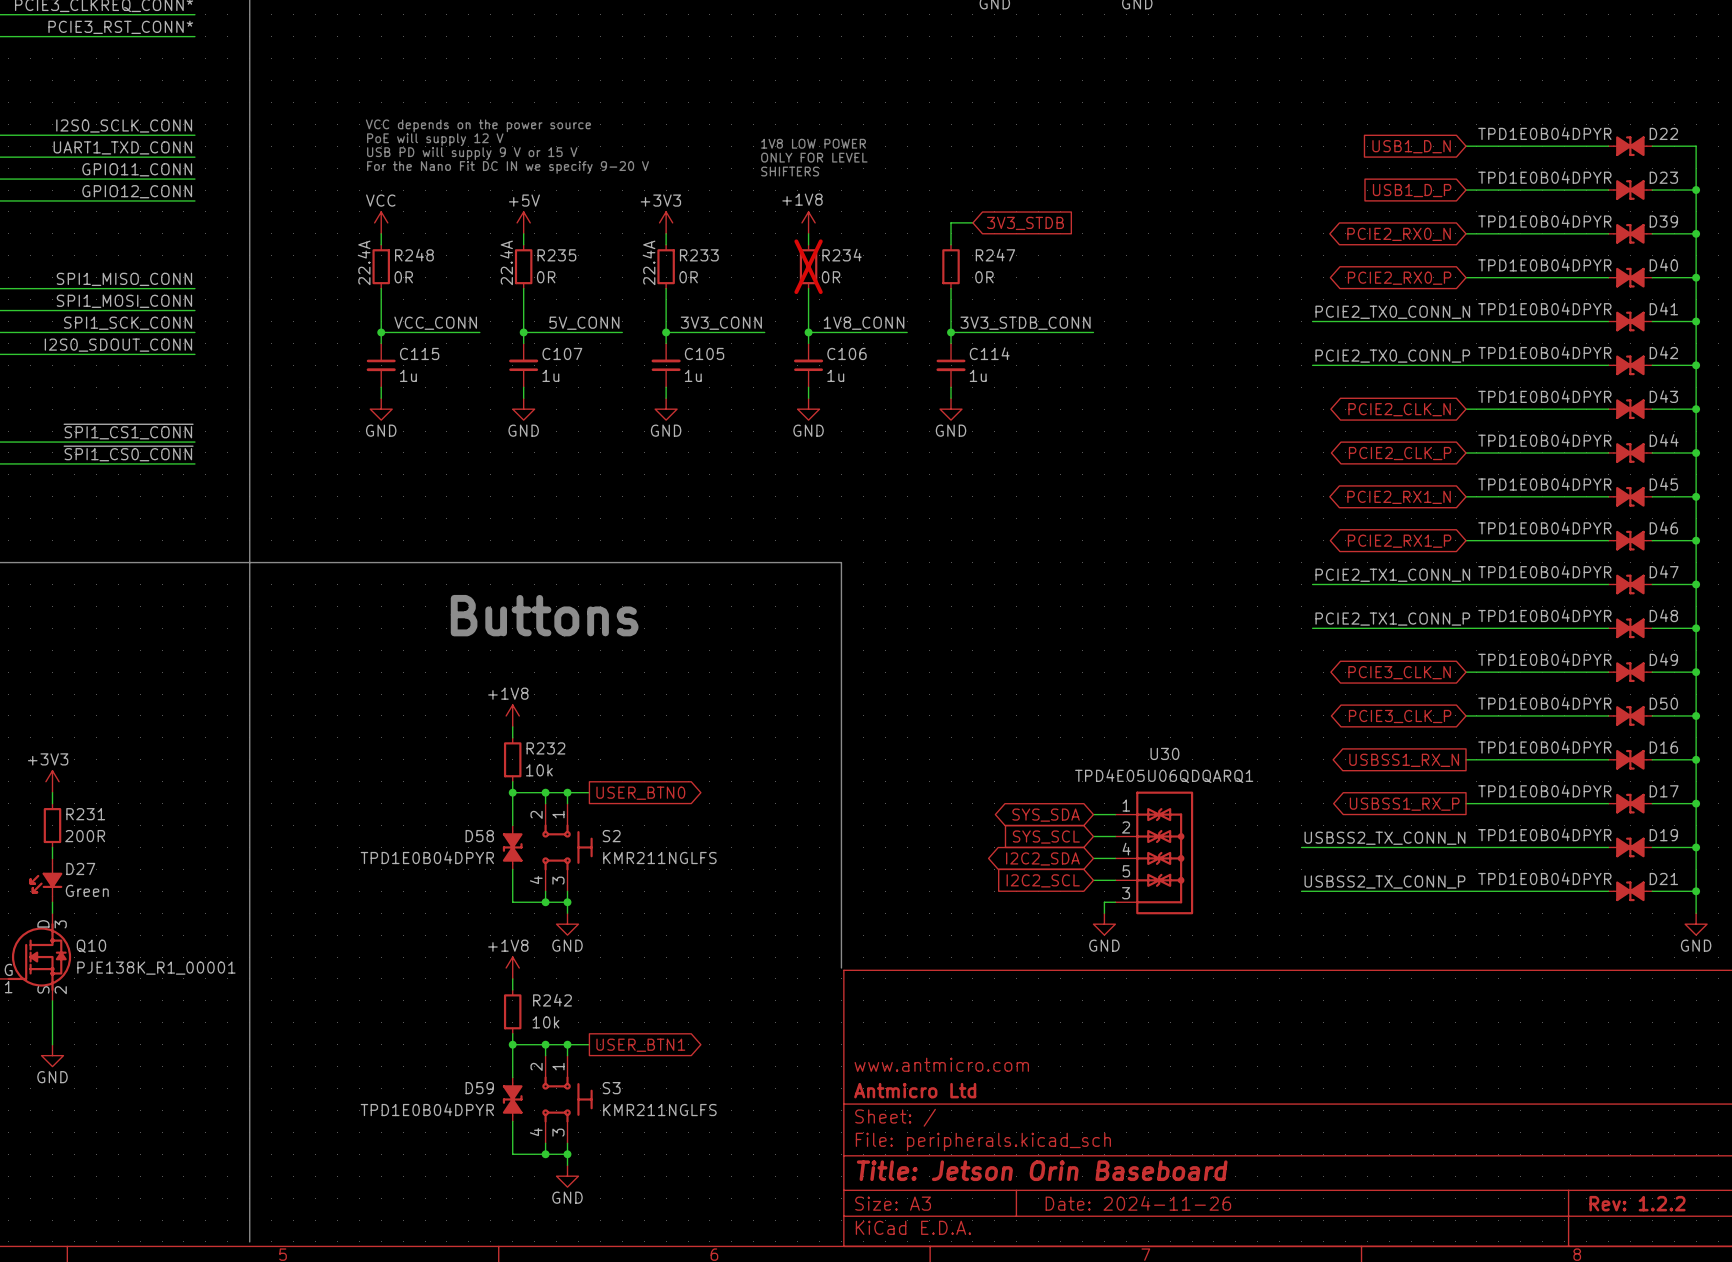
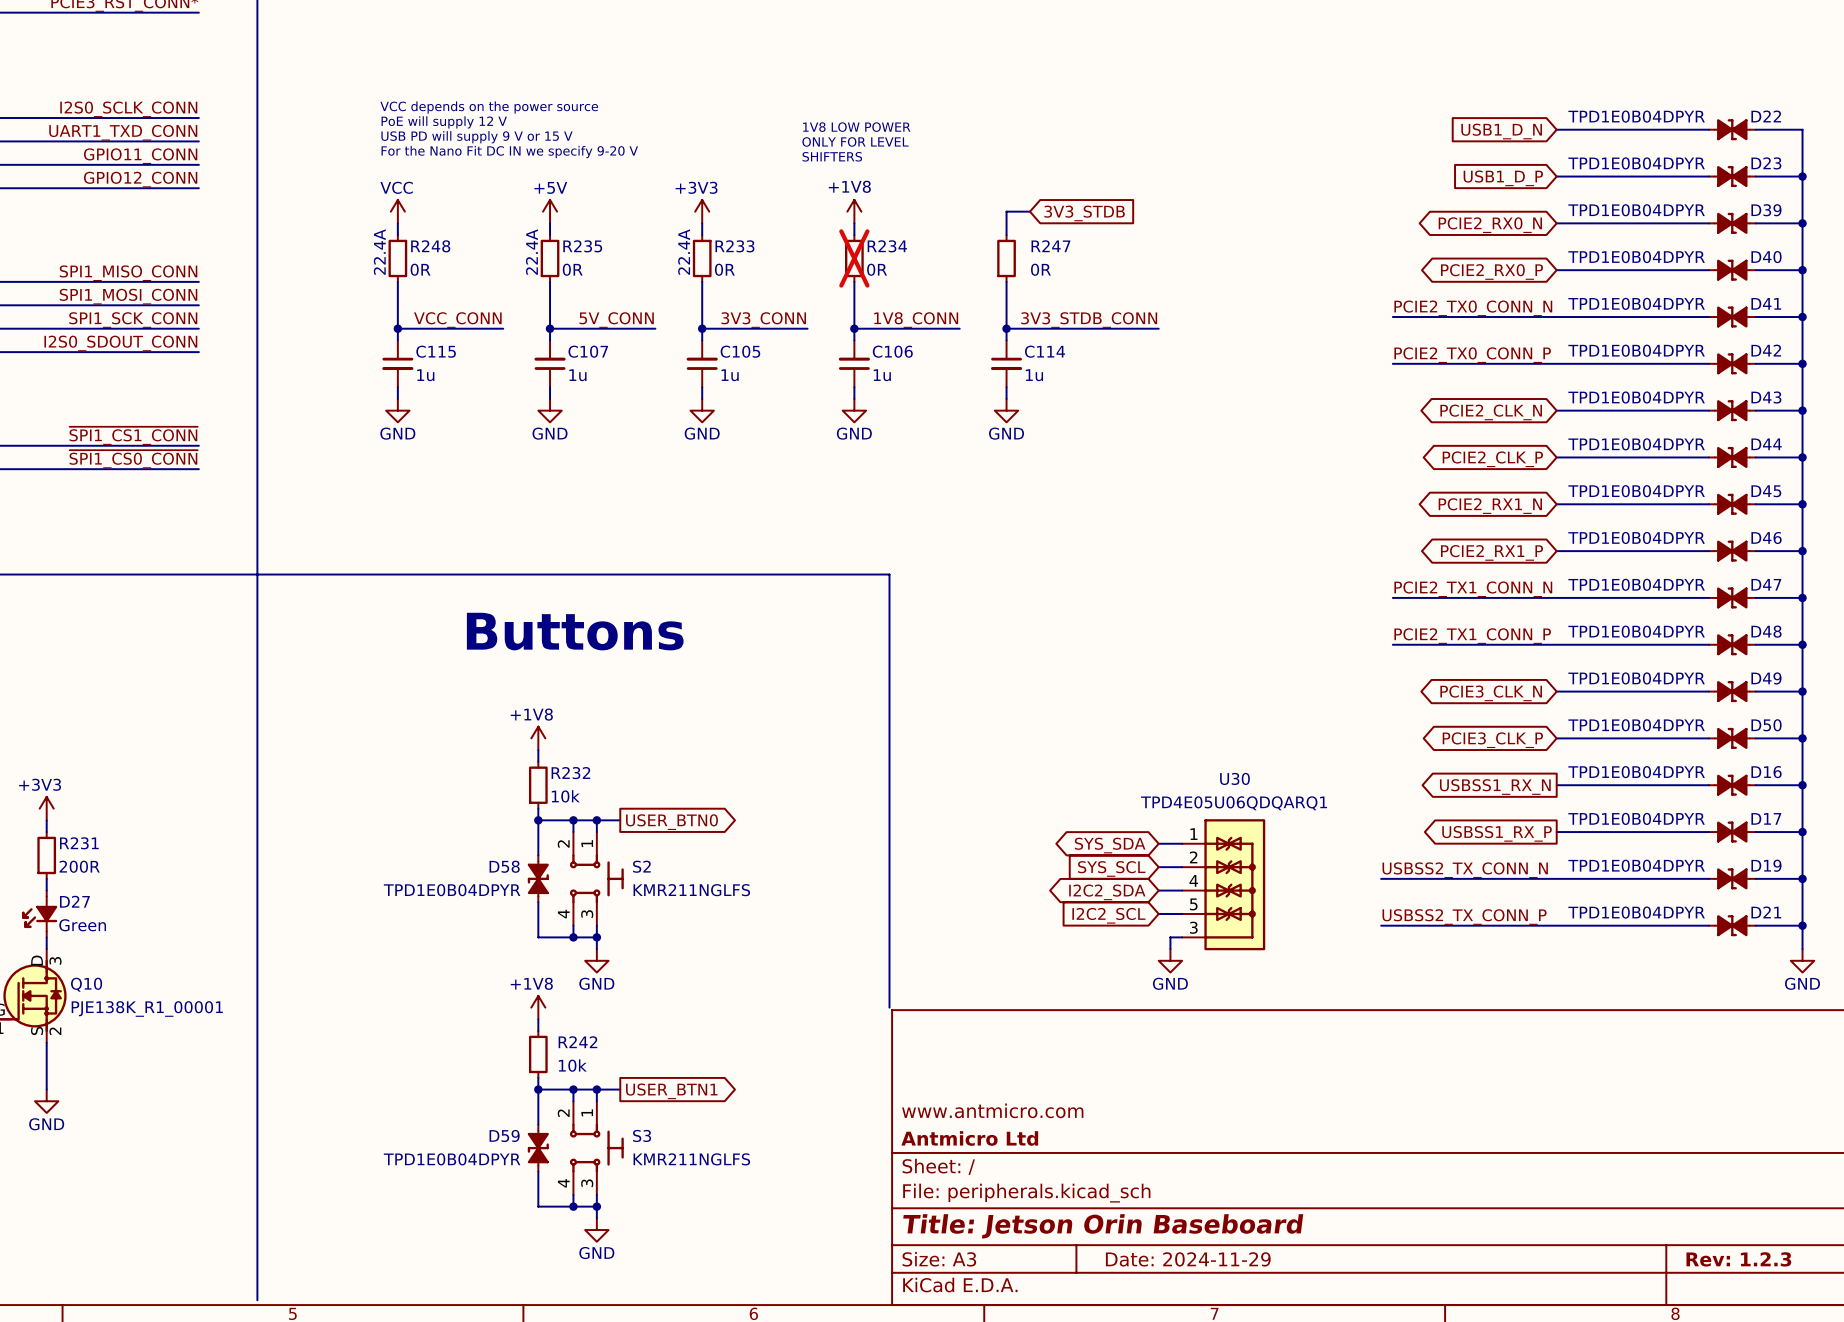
title block: Date: 2024-11-26 (1138, 1203) -> Date: 2024-11-29 (1188, 1259)
title block: Rev: 1.2.2 (1637, 1203) -> Rev: 1.2.3 (1738, 1259)

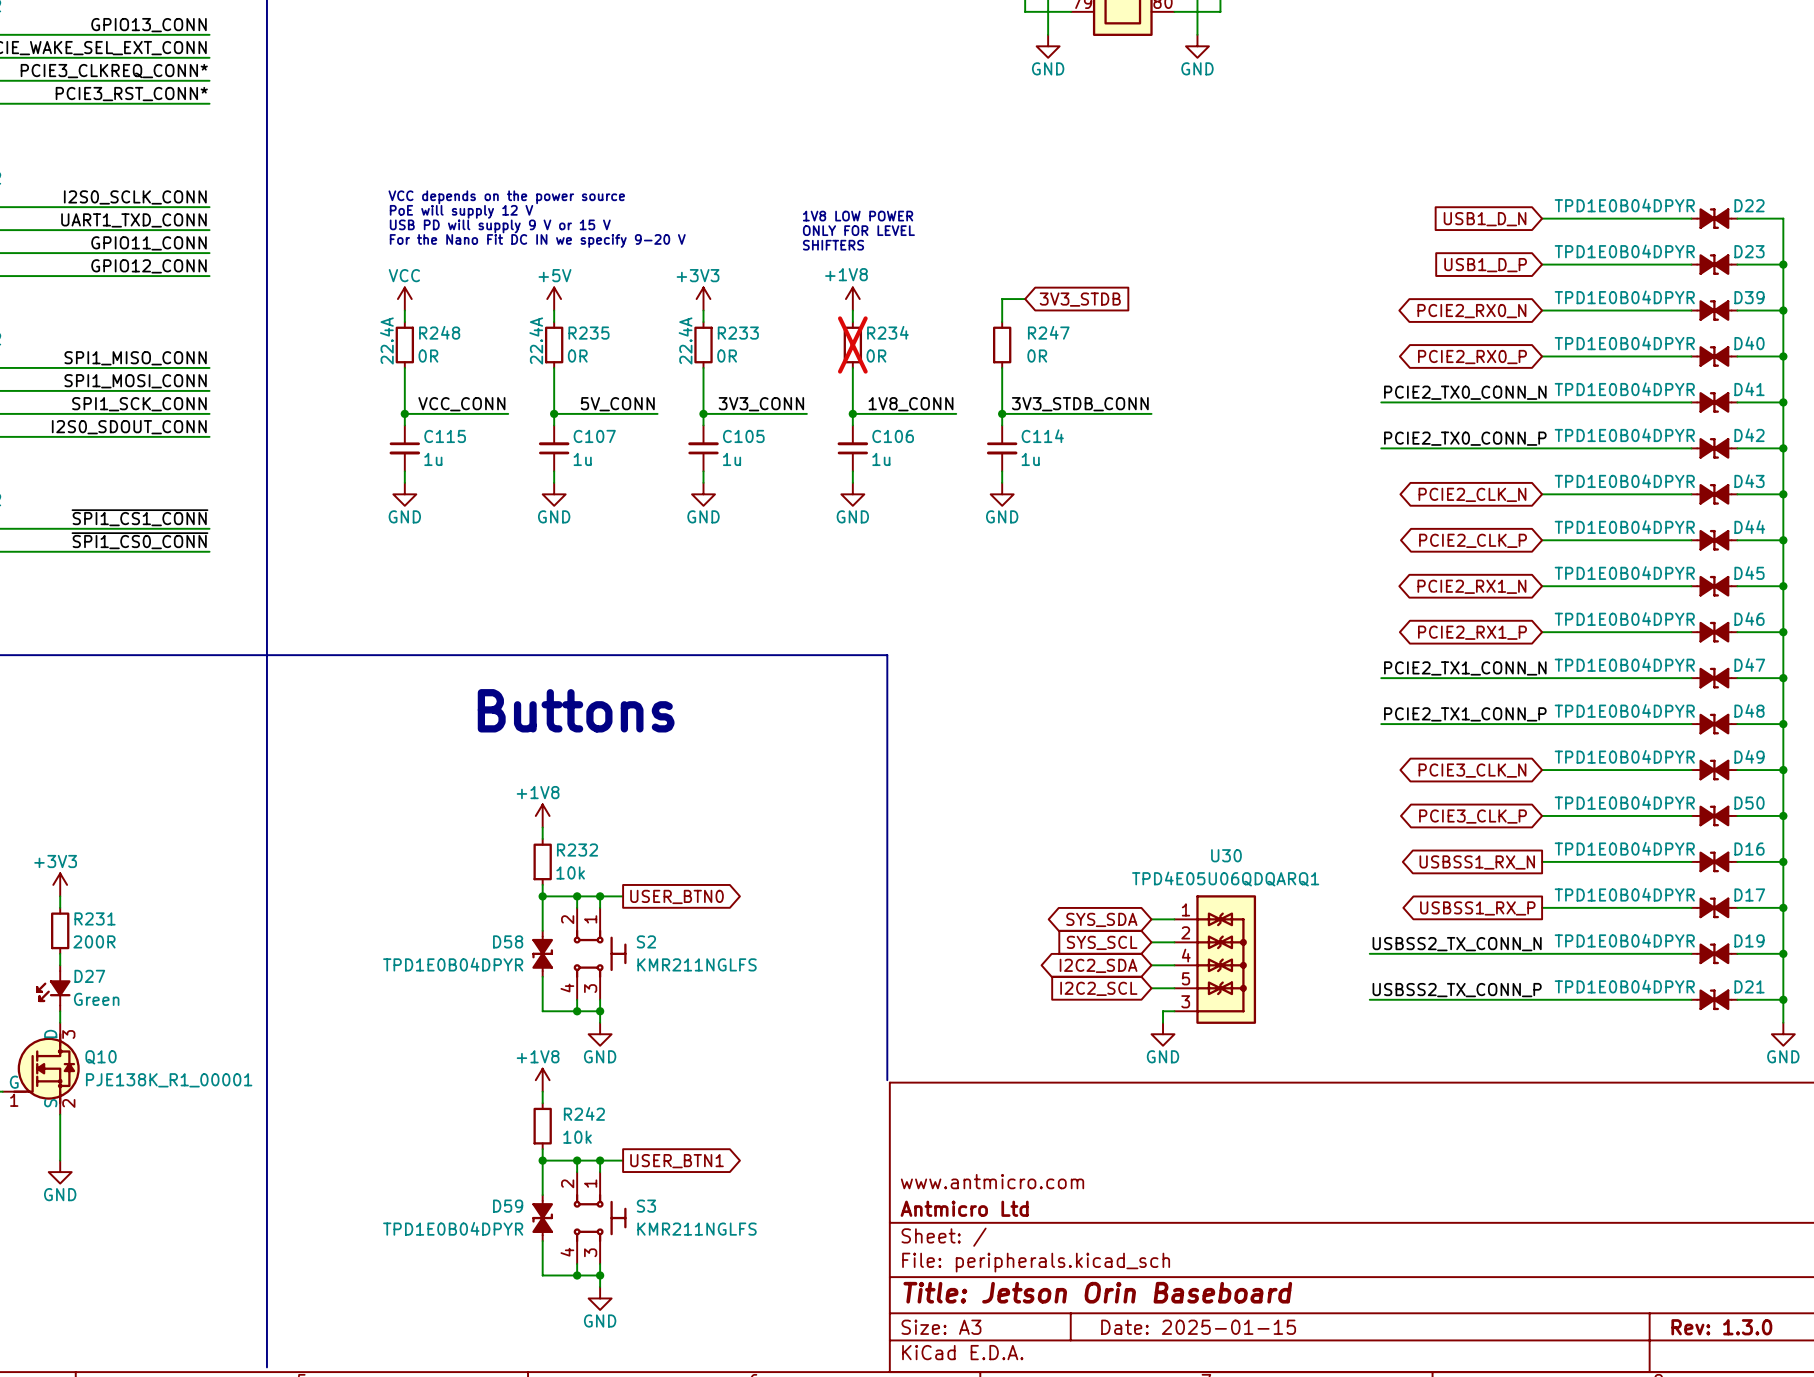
title block: Date: 2024-11-29 (1188, 1259) -> Date: 2025-01-15 (1198, 1327)
title block: Rev: 1.2.3 (1738, 1259) -> Rev: 1.3.0 (1721, 1327)

